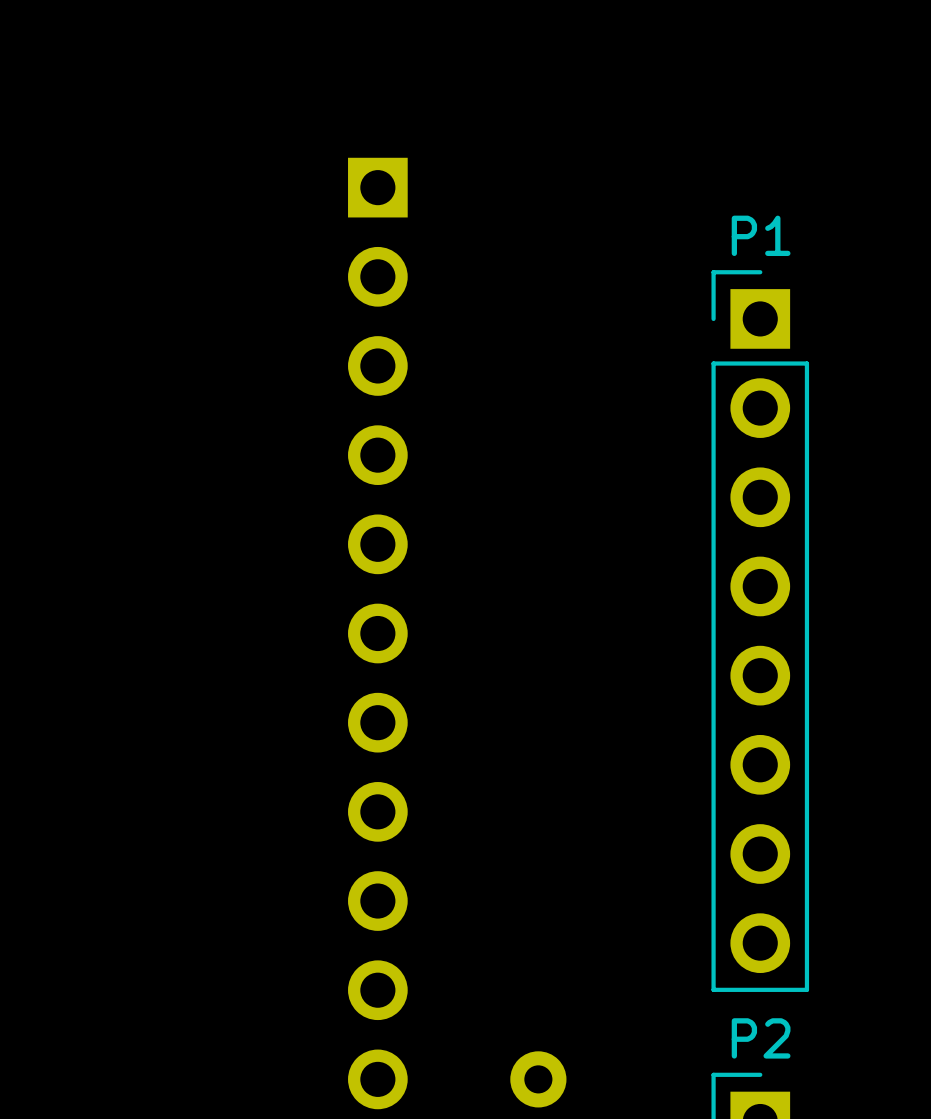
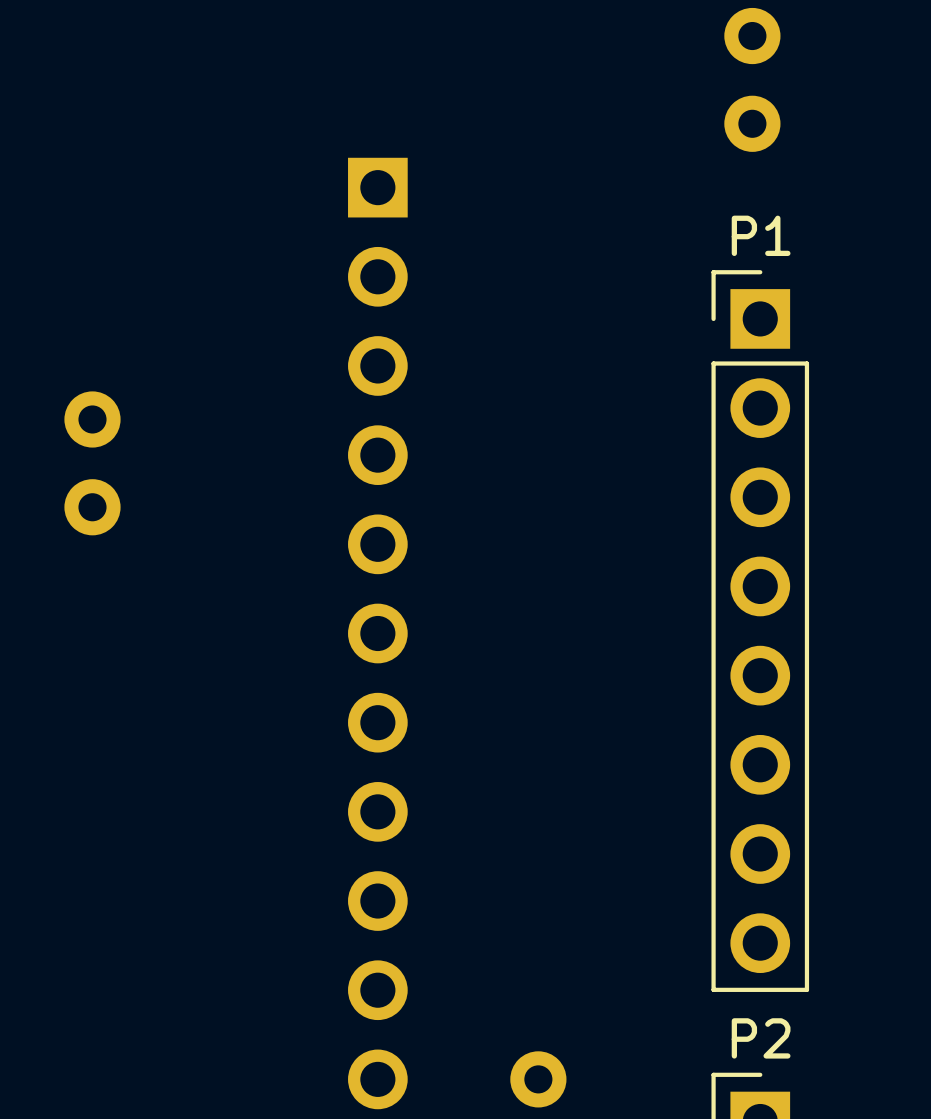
part: none -> (752, 79)
part: none -> (92, 463)

